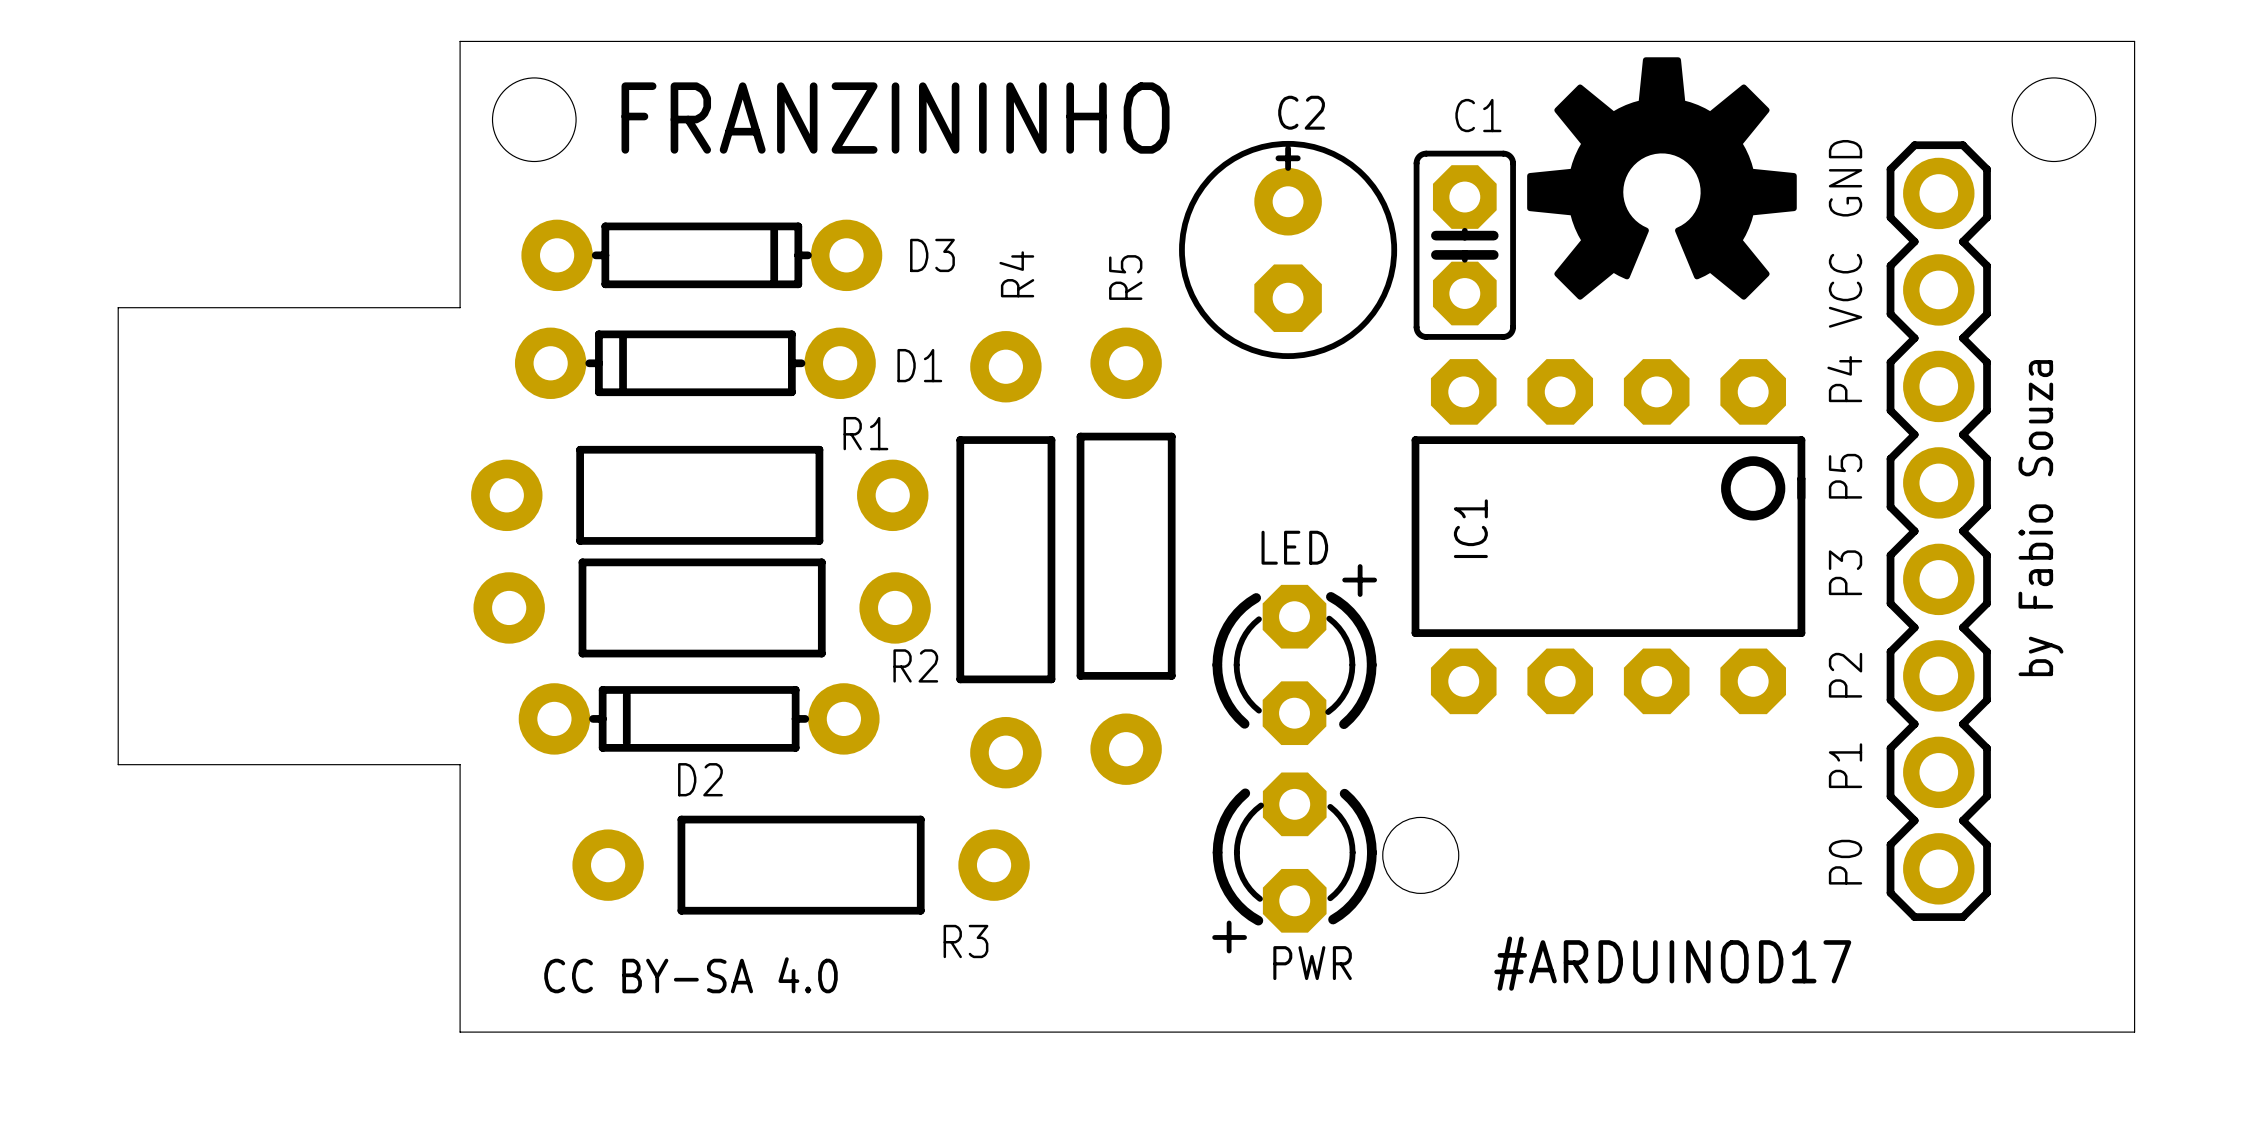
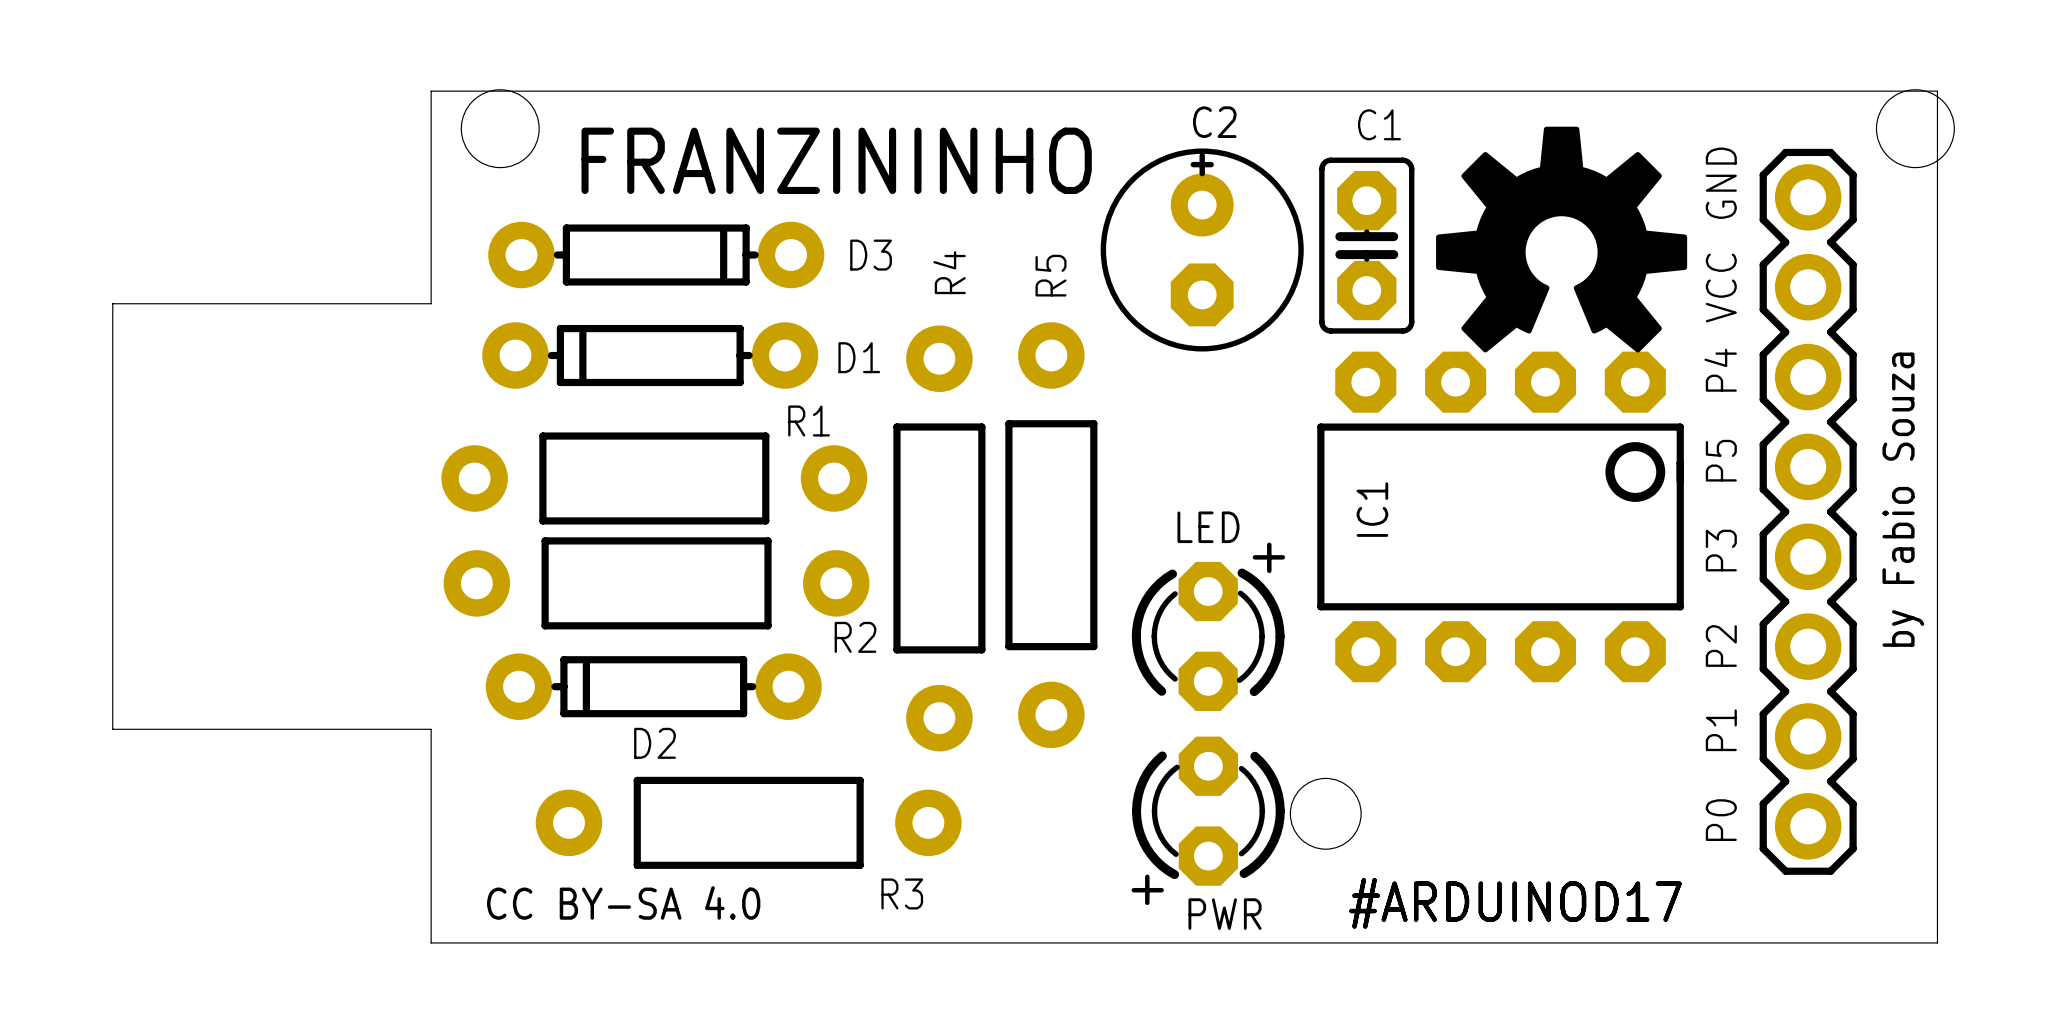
board edge: (460, 79) (460, 41) (2134, 41) (2134, 1032) (460, 1032) (460, 994) -> (431, 91) (1937, 91) (1937, 942) (431, 942)
text position: FRANZININHO (895, 118) -> FRANZININHO (836, 160)
drawing position: (1661, 178) -> (1561, 239)
text position: #ARDUINOD17 (1672, 963) -> #ARDUINOD17 (1515, 903)
text position: CC BY-SA 4.0 (690, 975) -> CC BY-SA 4.0 (623, 902)

